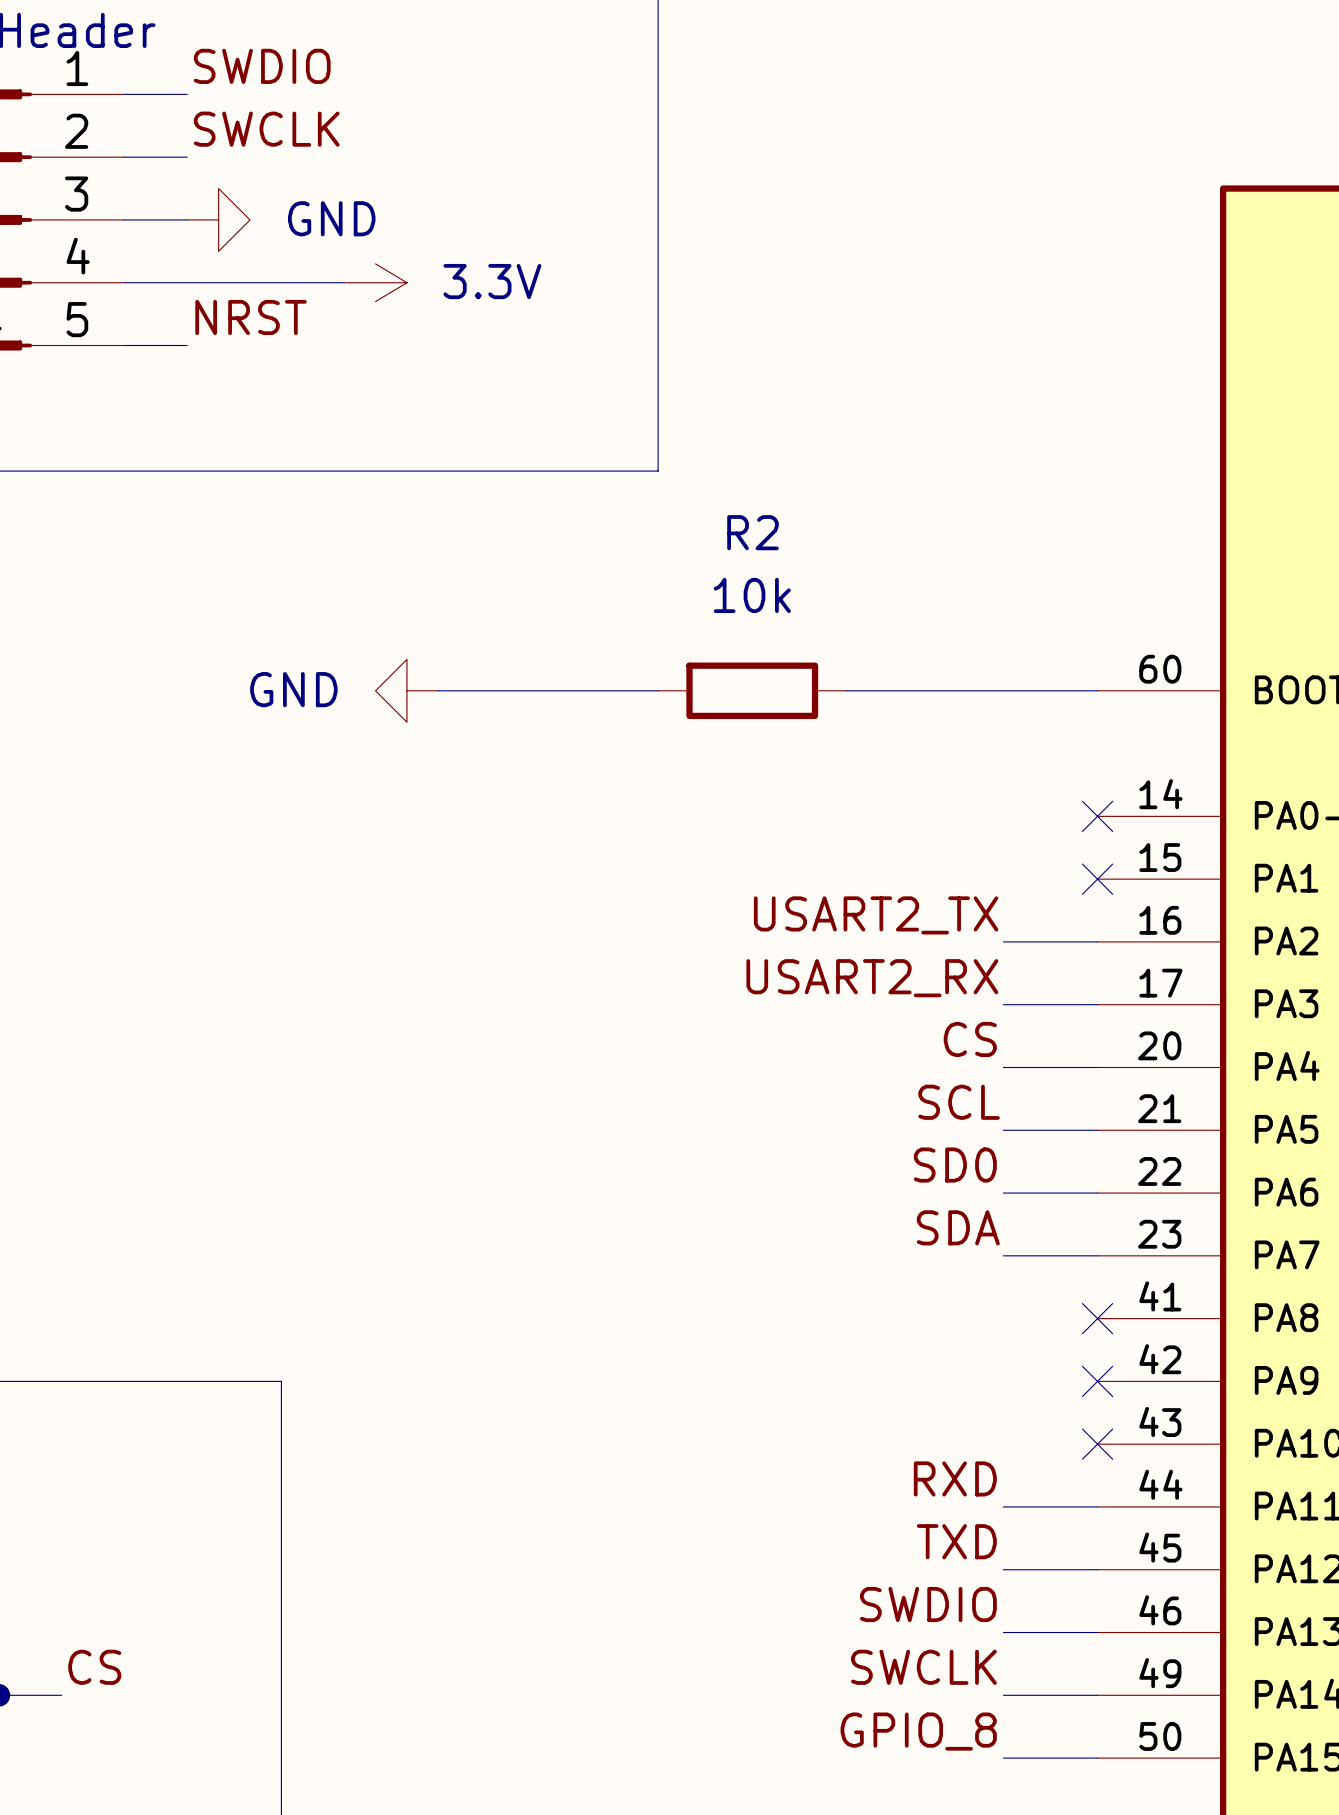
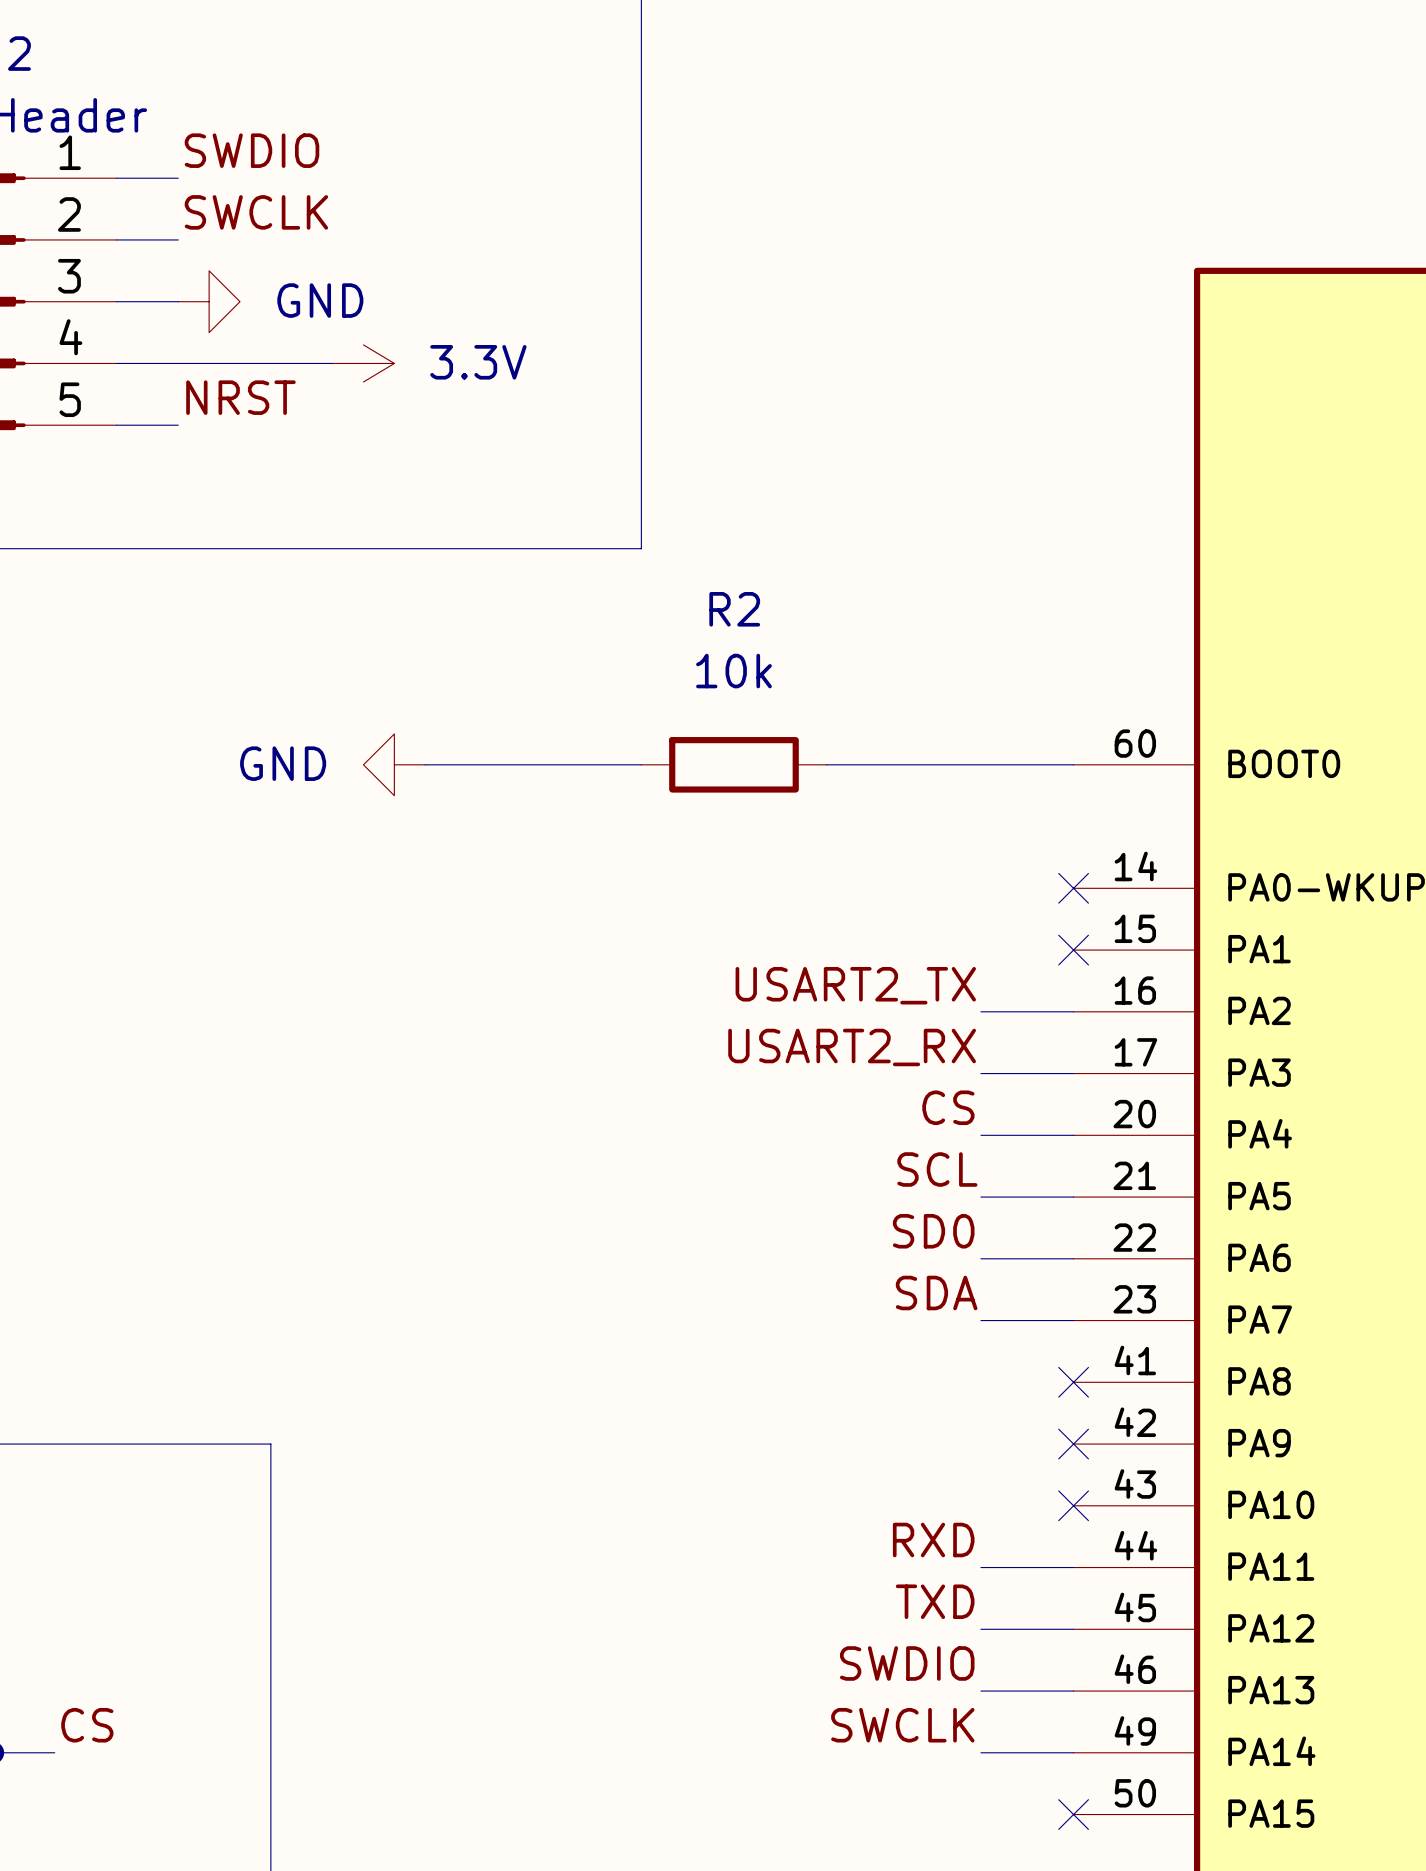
label: GPIO_8 (918, 1731) -> none
wire: (1003, 1758) (1097, 1758) -> none
no-connect mark: none -> (1073, 1814)

